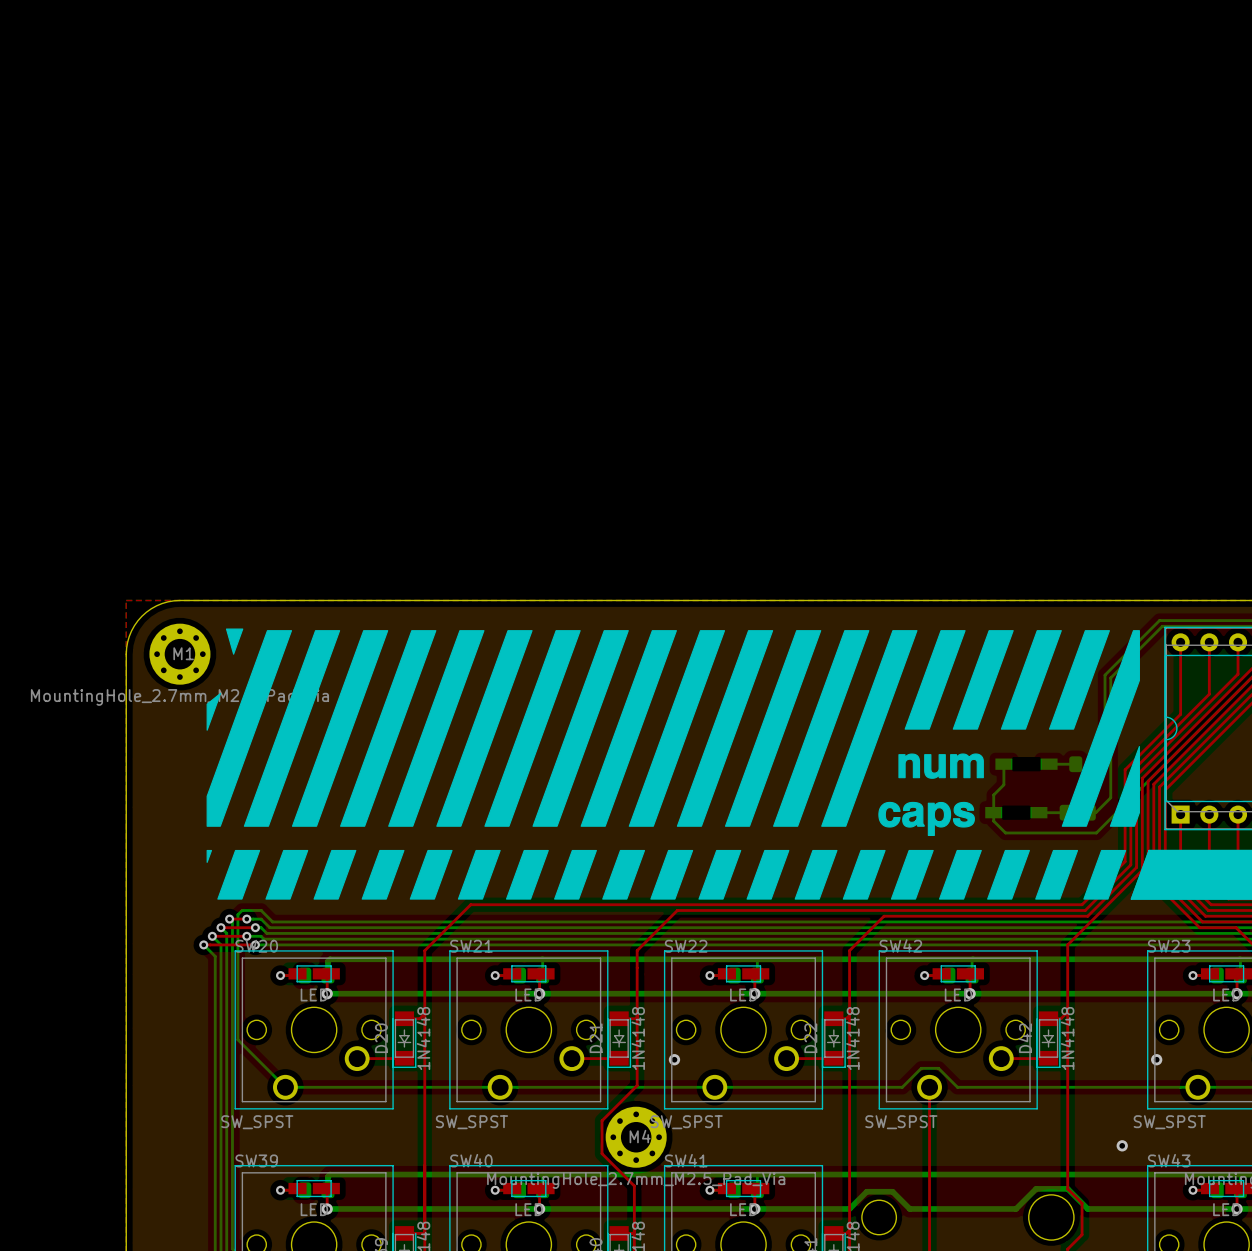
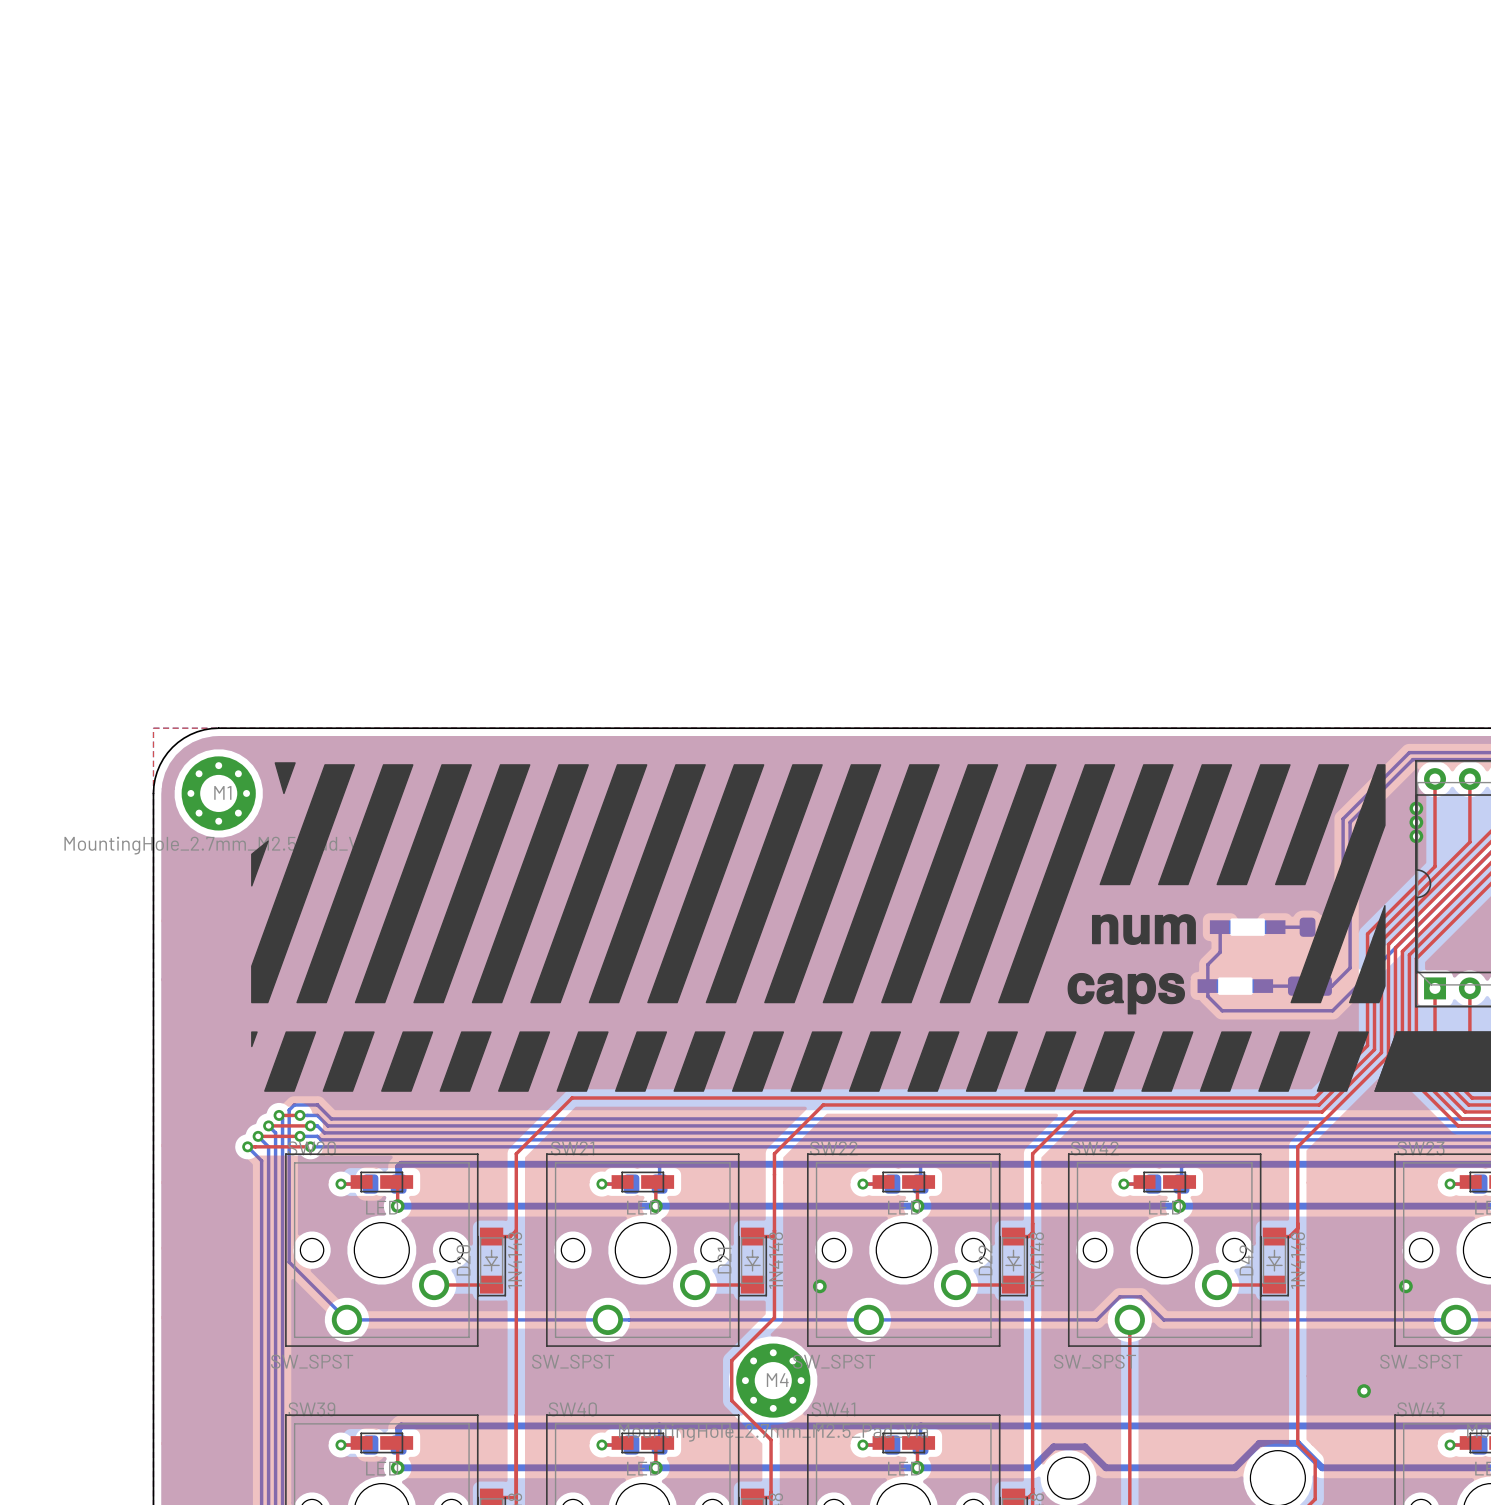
via: none -> (1416, 808)
via: none -> (1416, 822)
via: none -> (1416, 836)

